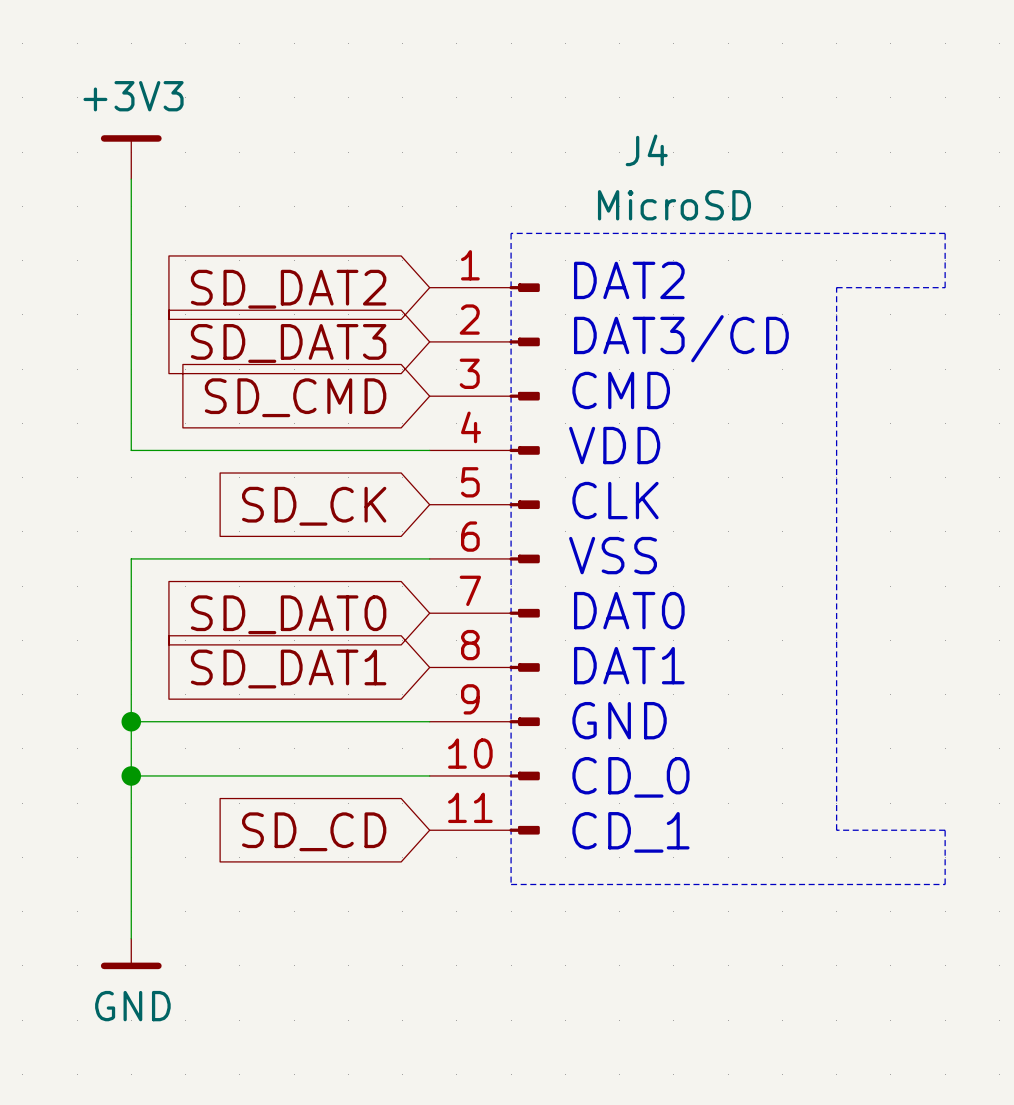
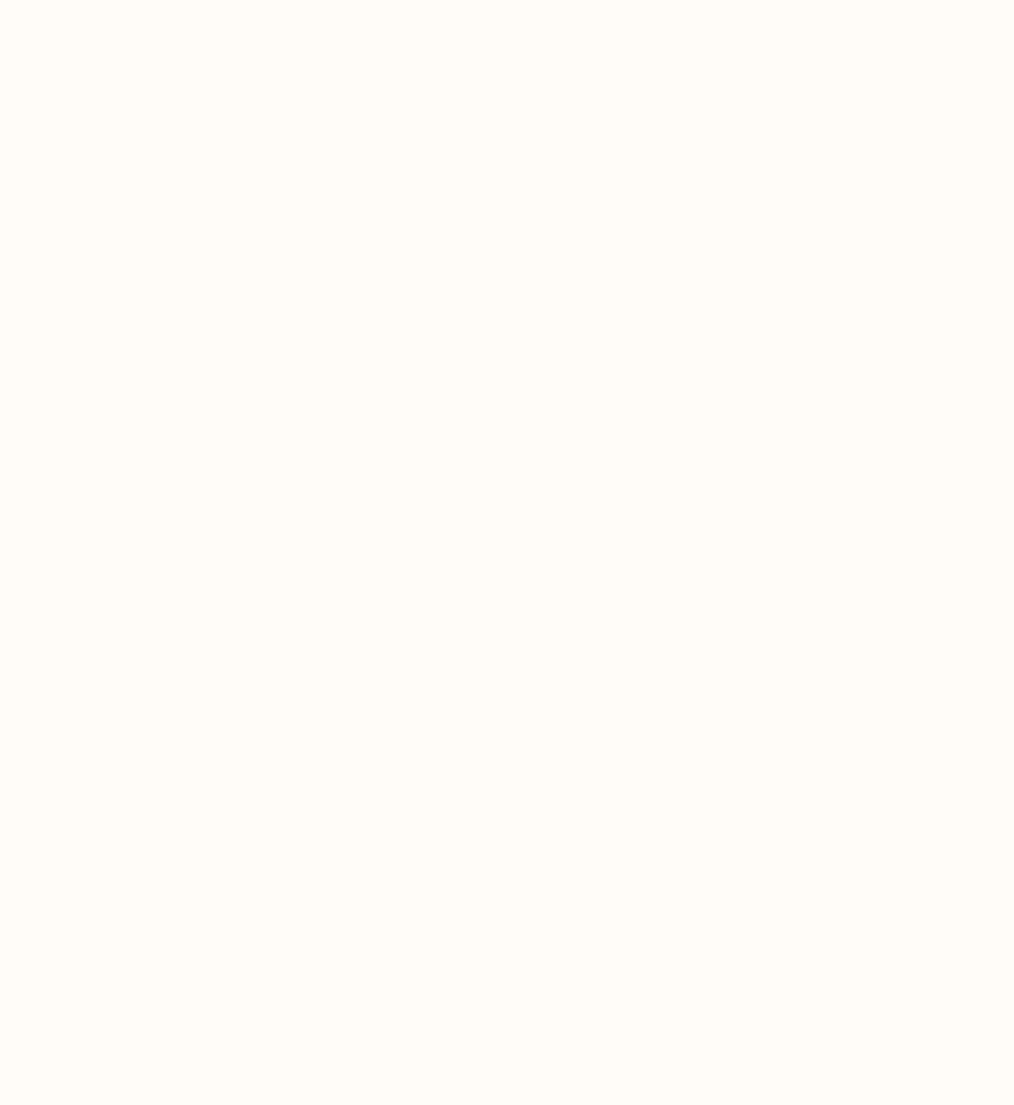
power symbol: +3V3 (131, 157) -> none
wire: (131, 179) (131, 450) (429, 450) -> none
line: (511, 233) (511, 884) (945, 884) (945, 830) (836, 830) (836, 287) (945, 287) (945, 233) (511, 233) -> none
text: DAT2 (629, 280) -> none
global label: SD_DAT2 (288, 289) -> none
text: DAT3/CD (681, 338) -> none
global label: SD_DAT3 (288, 343) -> none
text: CMD (621, 390) -> none
global label: SD_CMD (295, 397) -> none
text: VDD (614, 445) -> none
text: CLK (615, 500) -> none
global label: SD_CK (314, 506) -> none
text: VSS (613, 555) -> none
wire: (429, 558) (131, 558) (131, 938) -> none
J4: MicroSD (484, 558) -> none
text: DAT0 (629, 610) -> none
global label: SD_DAT0 (288, 614) -> none
text: DAT1 (629, 665) -> none
global label: SD_DAT1 (288, 669) -> none
text: GND (619, 720) -> none
wire: (131, 721) (429, 721) -> none
junction: (131, 721) -> none
wire: (131, 775) (429, 775) -> none
junction: (131, 775) -> none
text: CD_0 (630, 777) -> none
global label: SD_CD (314, 831) -> none
text: CD_1 (630, 832) -> none
power symbol: GND (131, 953) -> none

